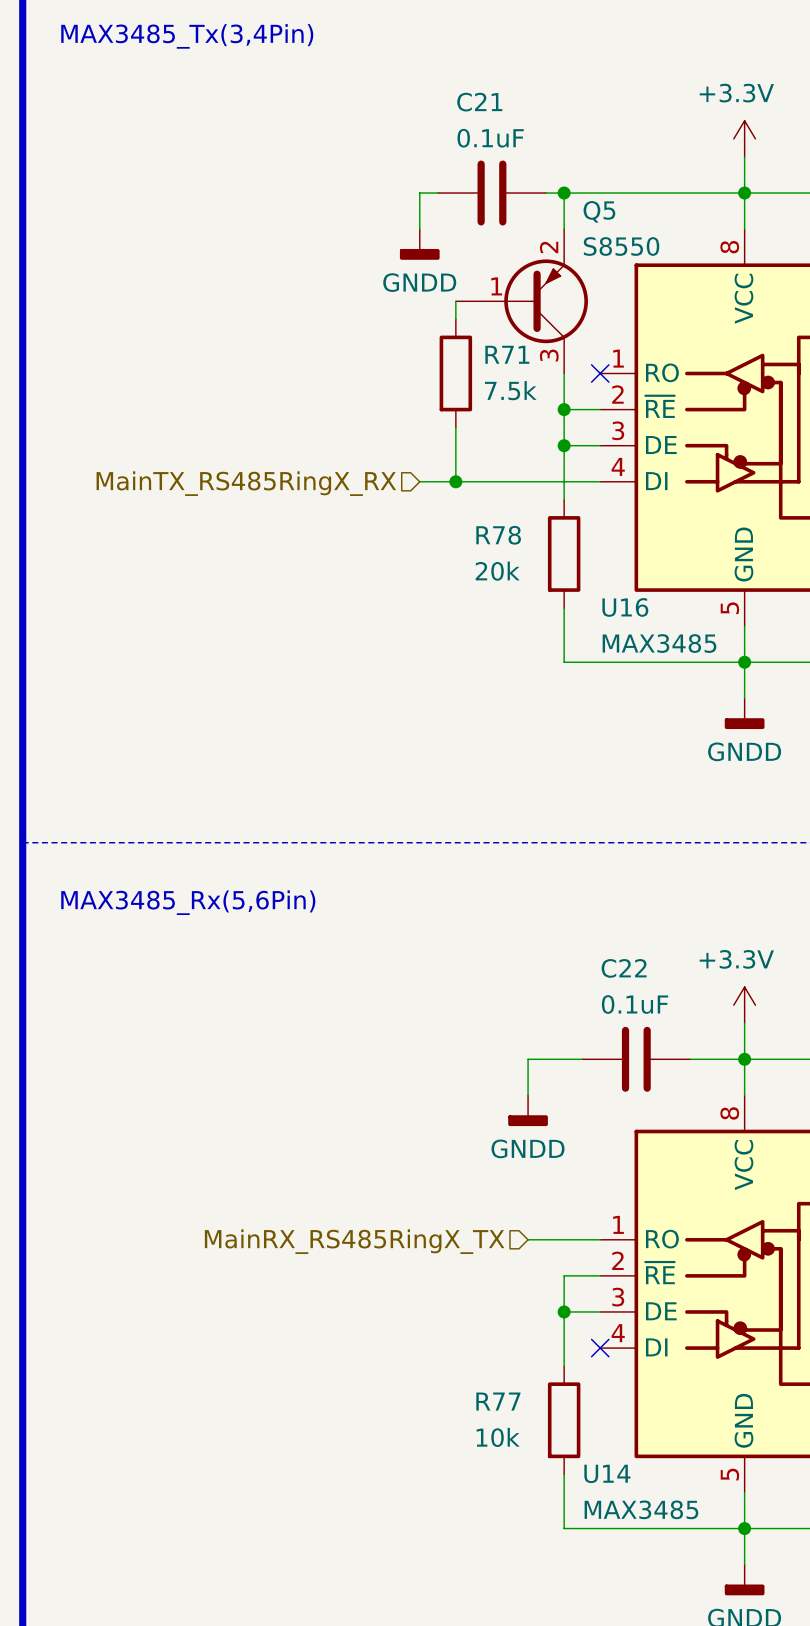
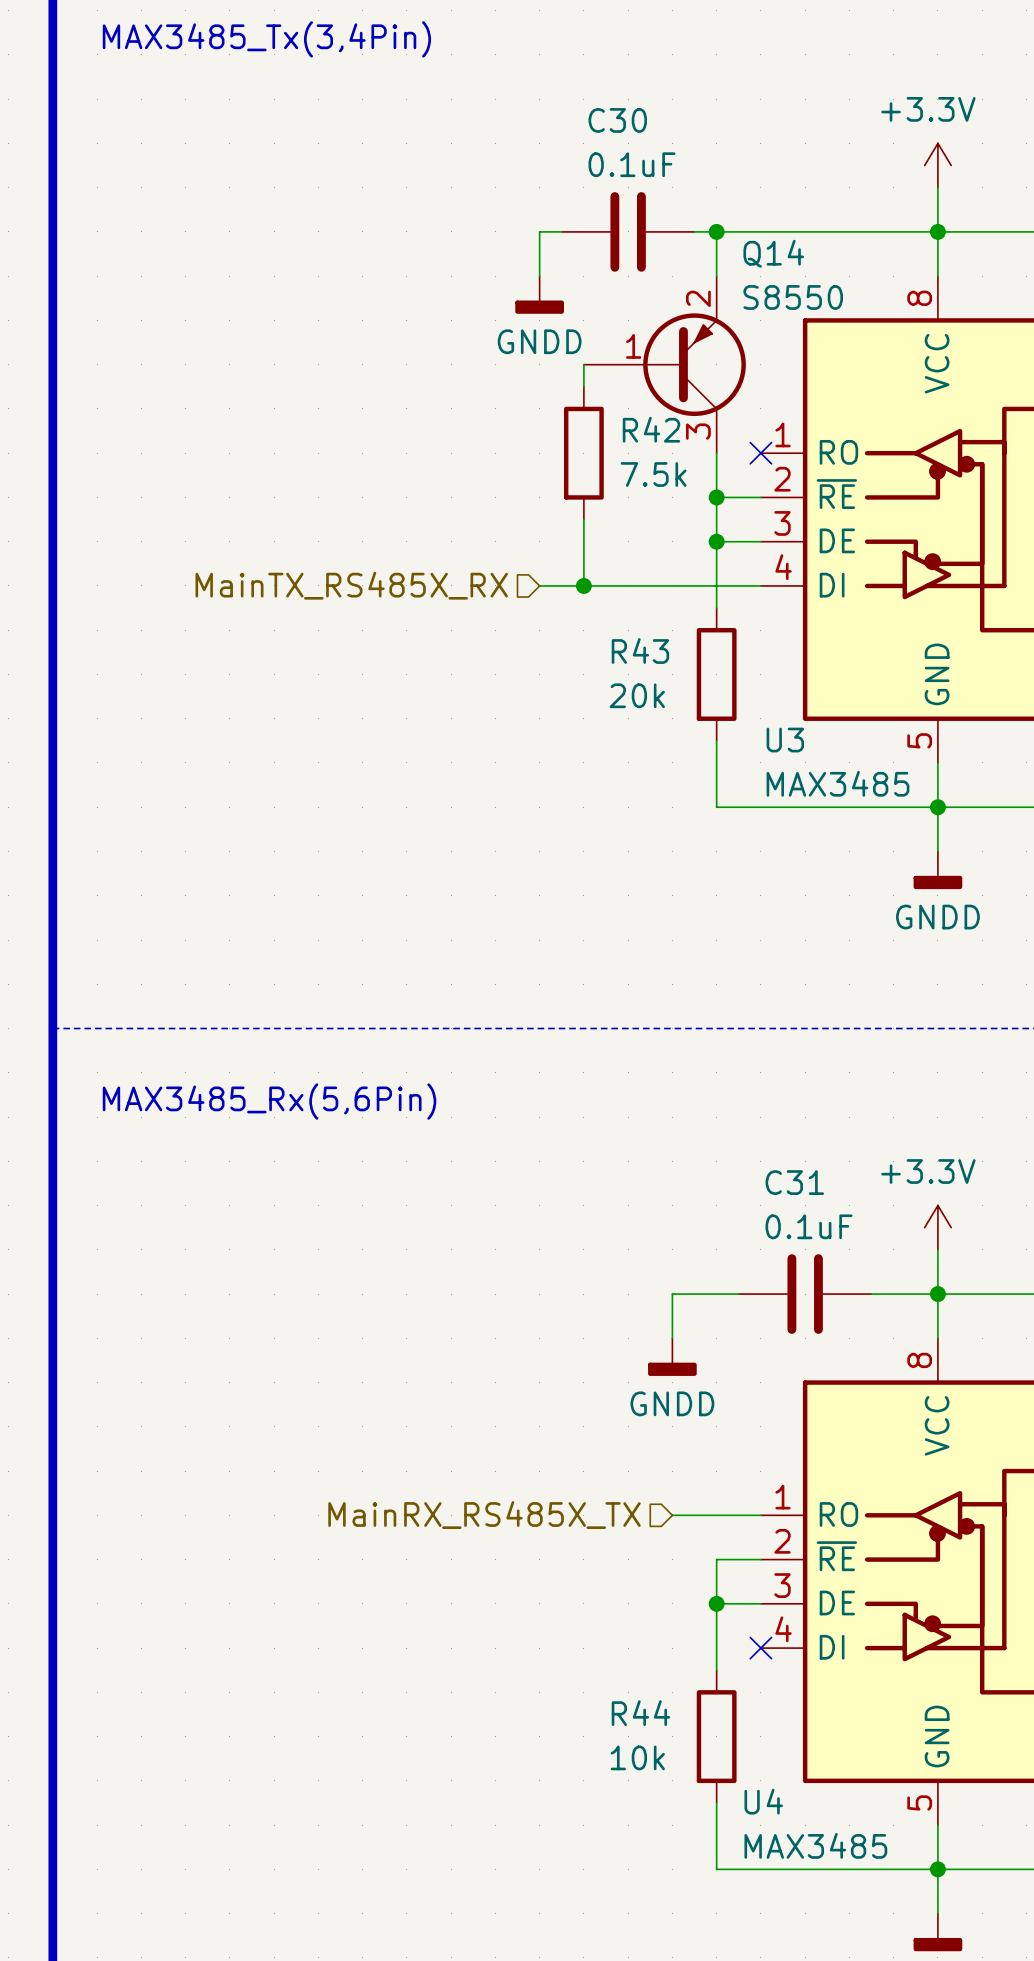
C21 name: C21 (479, 102) -> C30 (617, 120)
Q5 name: Q5 (599, 211) -> Q14 (773, 253)
R71 name: R71 (507, 354) -> R42 (651, 429)
hierarchical label: MainTX_RS485RingX_RX (246, 483) -> MainTX_RS485X_RX (351, 585)
R78 name: R78 (498, 535) -> R43 (640, 650)
U16 name: U16 (625, 607) -> U3 (785, 740)
C22 name: C22 (624, 968) -> C31 (794, 1182)
hierarchical label: MainRX_RS485RingX_TX (354, 1241) -> MainRX_RS485X_TX (484, 1515)
R77 name: R77 (498, 1401) -> R44 (640, 1713)
U14 name: U14 (607, 1473) -> U4 (763, 1801)

